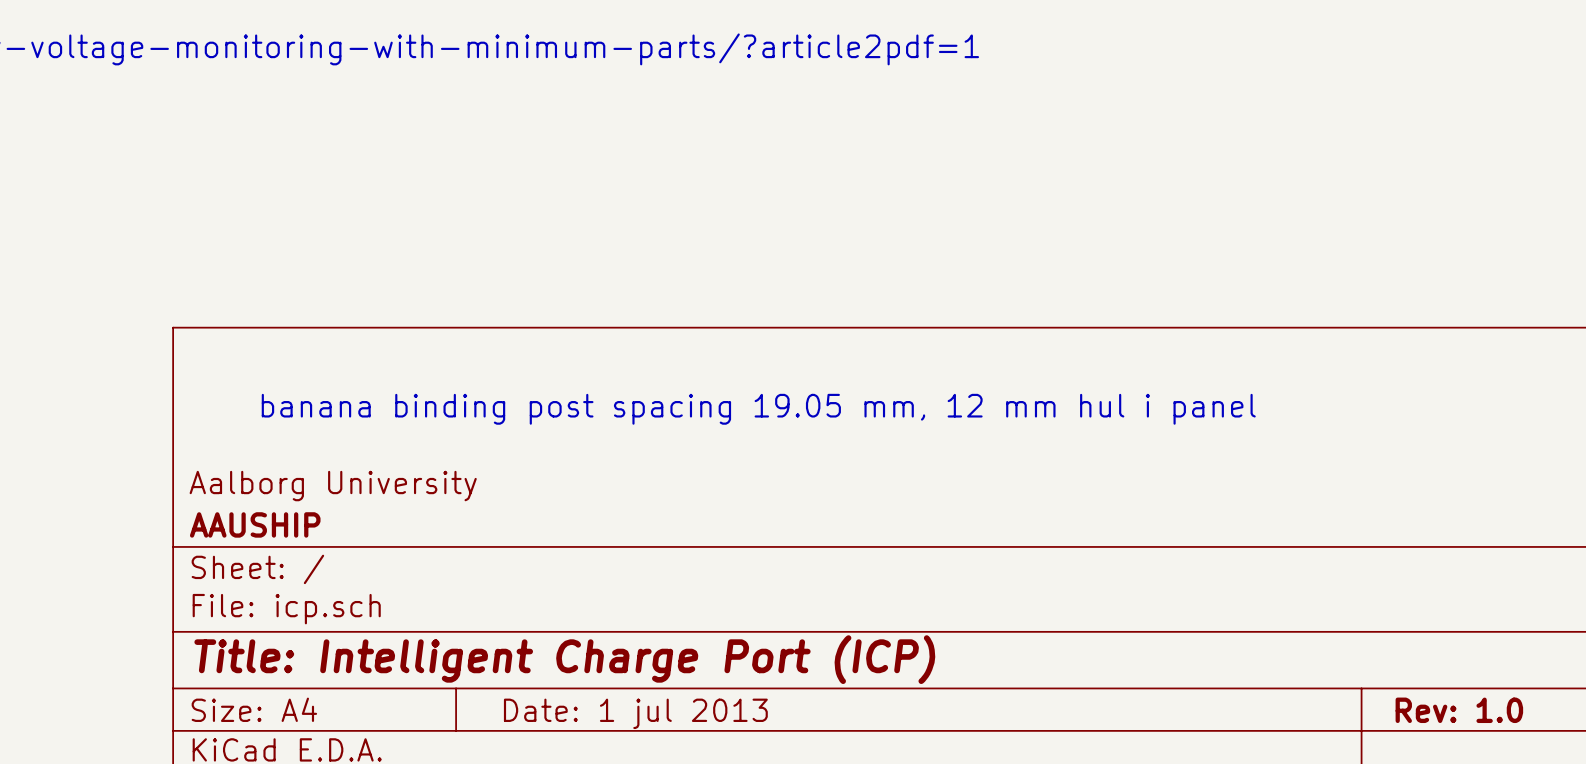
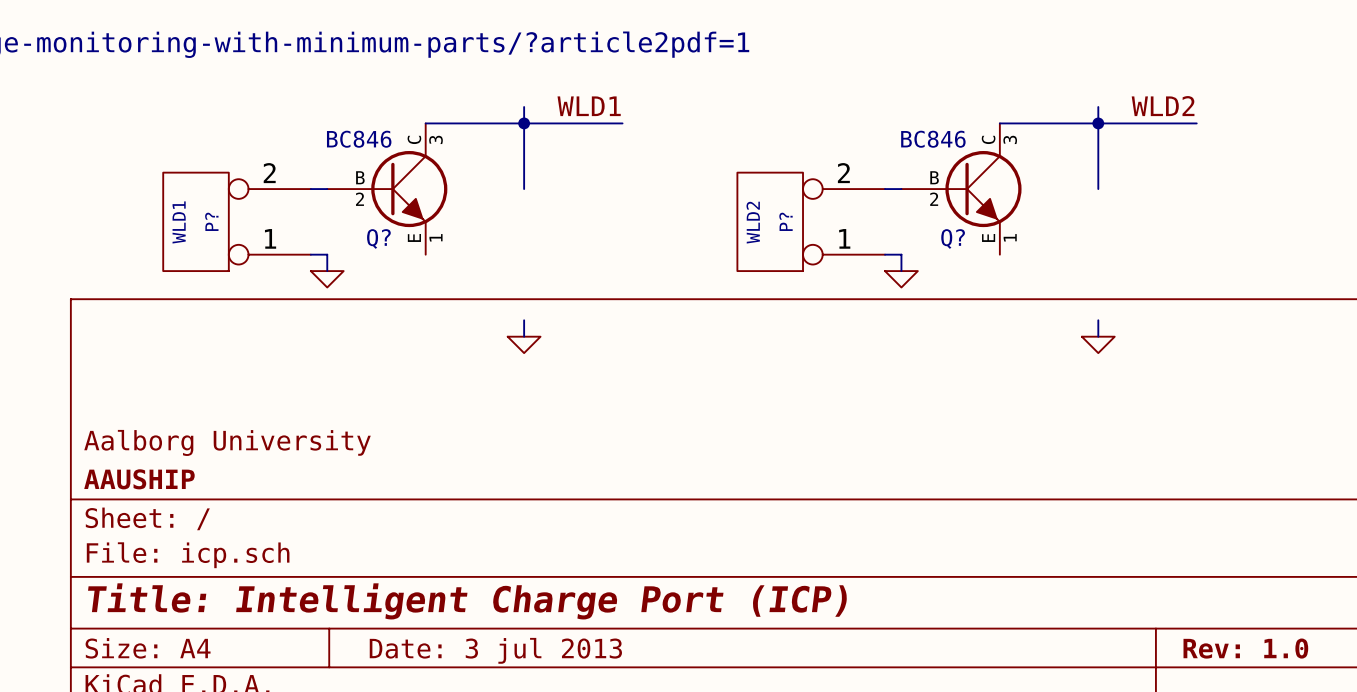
label: none -> WLD1 (589, 106)
label: none -> WLD2 (1163, 106)
wire: none -> (524, 107) (524, 189)
wire: none -> (1098, 107) (1098, 189)
wire: none -> (425, 123) (622, 123)
junction: none -> (524, 123)
wire: none -> (999, 123) (1196, 123)
junction: none -> (1098, 123)
wire: none -> (310, 189) (327, 189)
Q?: none -> BC846 (387, 189)
wire: none -> (885, 189) (901, 189)
Q?: none -> BC846 (961, 189)
P?: none -> WLD1 (237, 221)
P?: none -> WLD2 (811, 221)
wire: none -> (310, 254) (327, 254) (327, 271)
wire: none -> (885, 254) (901, 254) (901, 271)
power symbol: none -> (327, 279)
power symbol: none -> (901, 279)
wire: none -> (524, 320) (524, 336)
wire: none -> (1098, 320) (1098, 336)
power symbol: none -> (524, 344)
power symbol: none -> (1098, 344)
text: banana binding post spacing 19.05 mm, 12 mm hul i panel (758, 409) -> none
title block: Date: 1 jul 2013 (635, 713) -> Date: 3 jul 2013 (495, 650)

